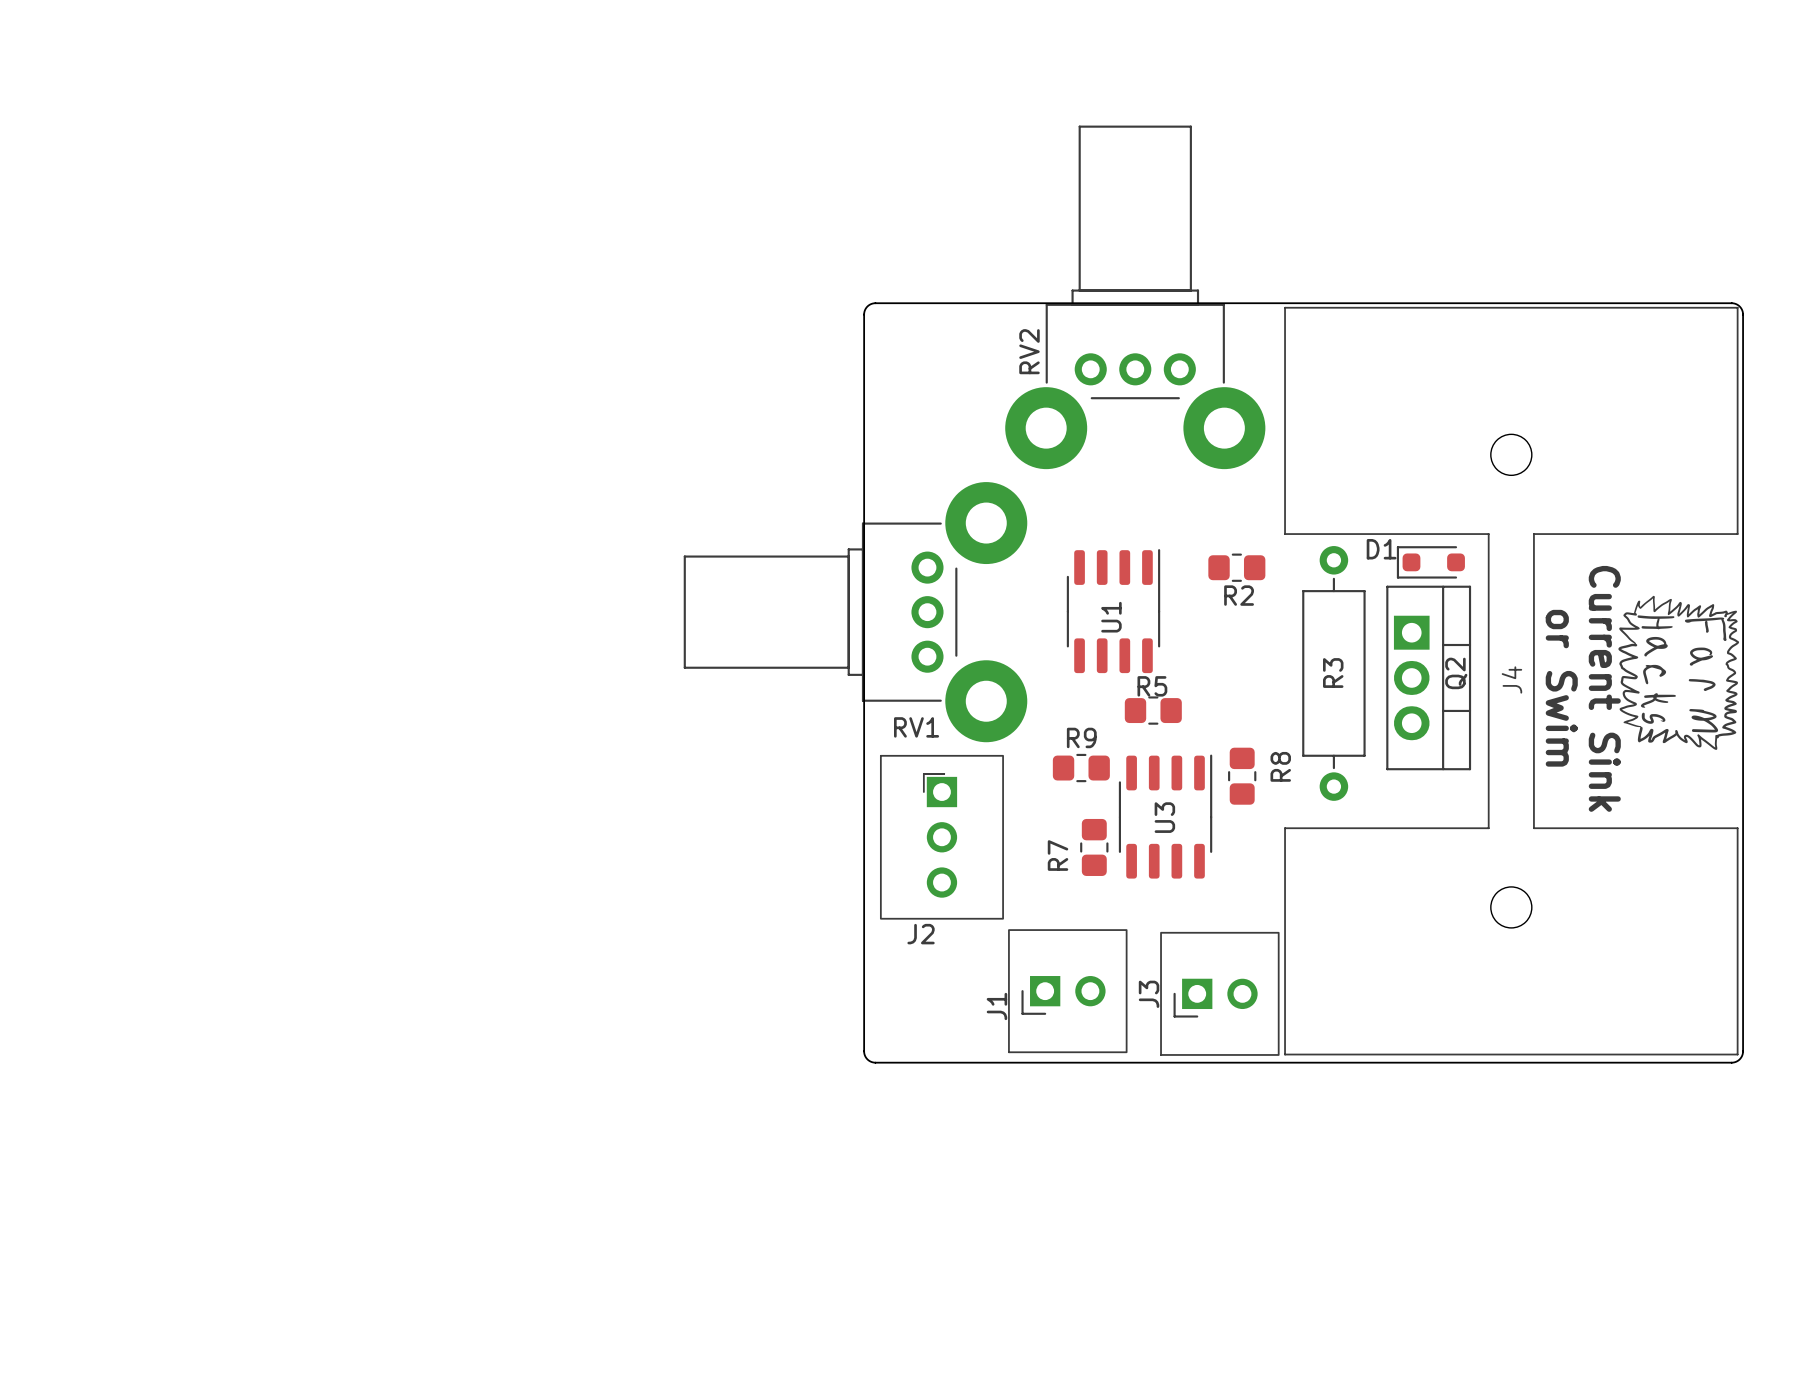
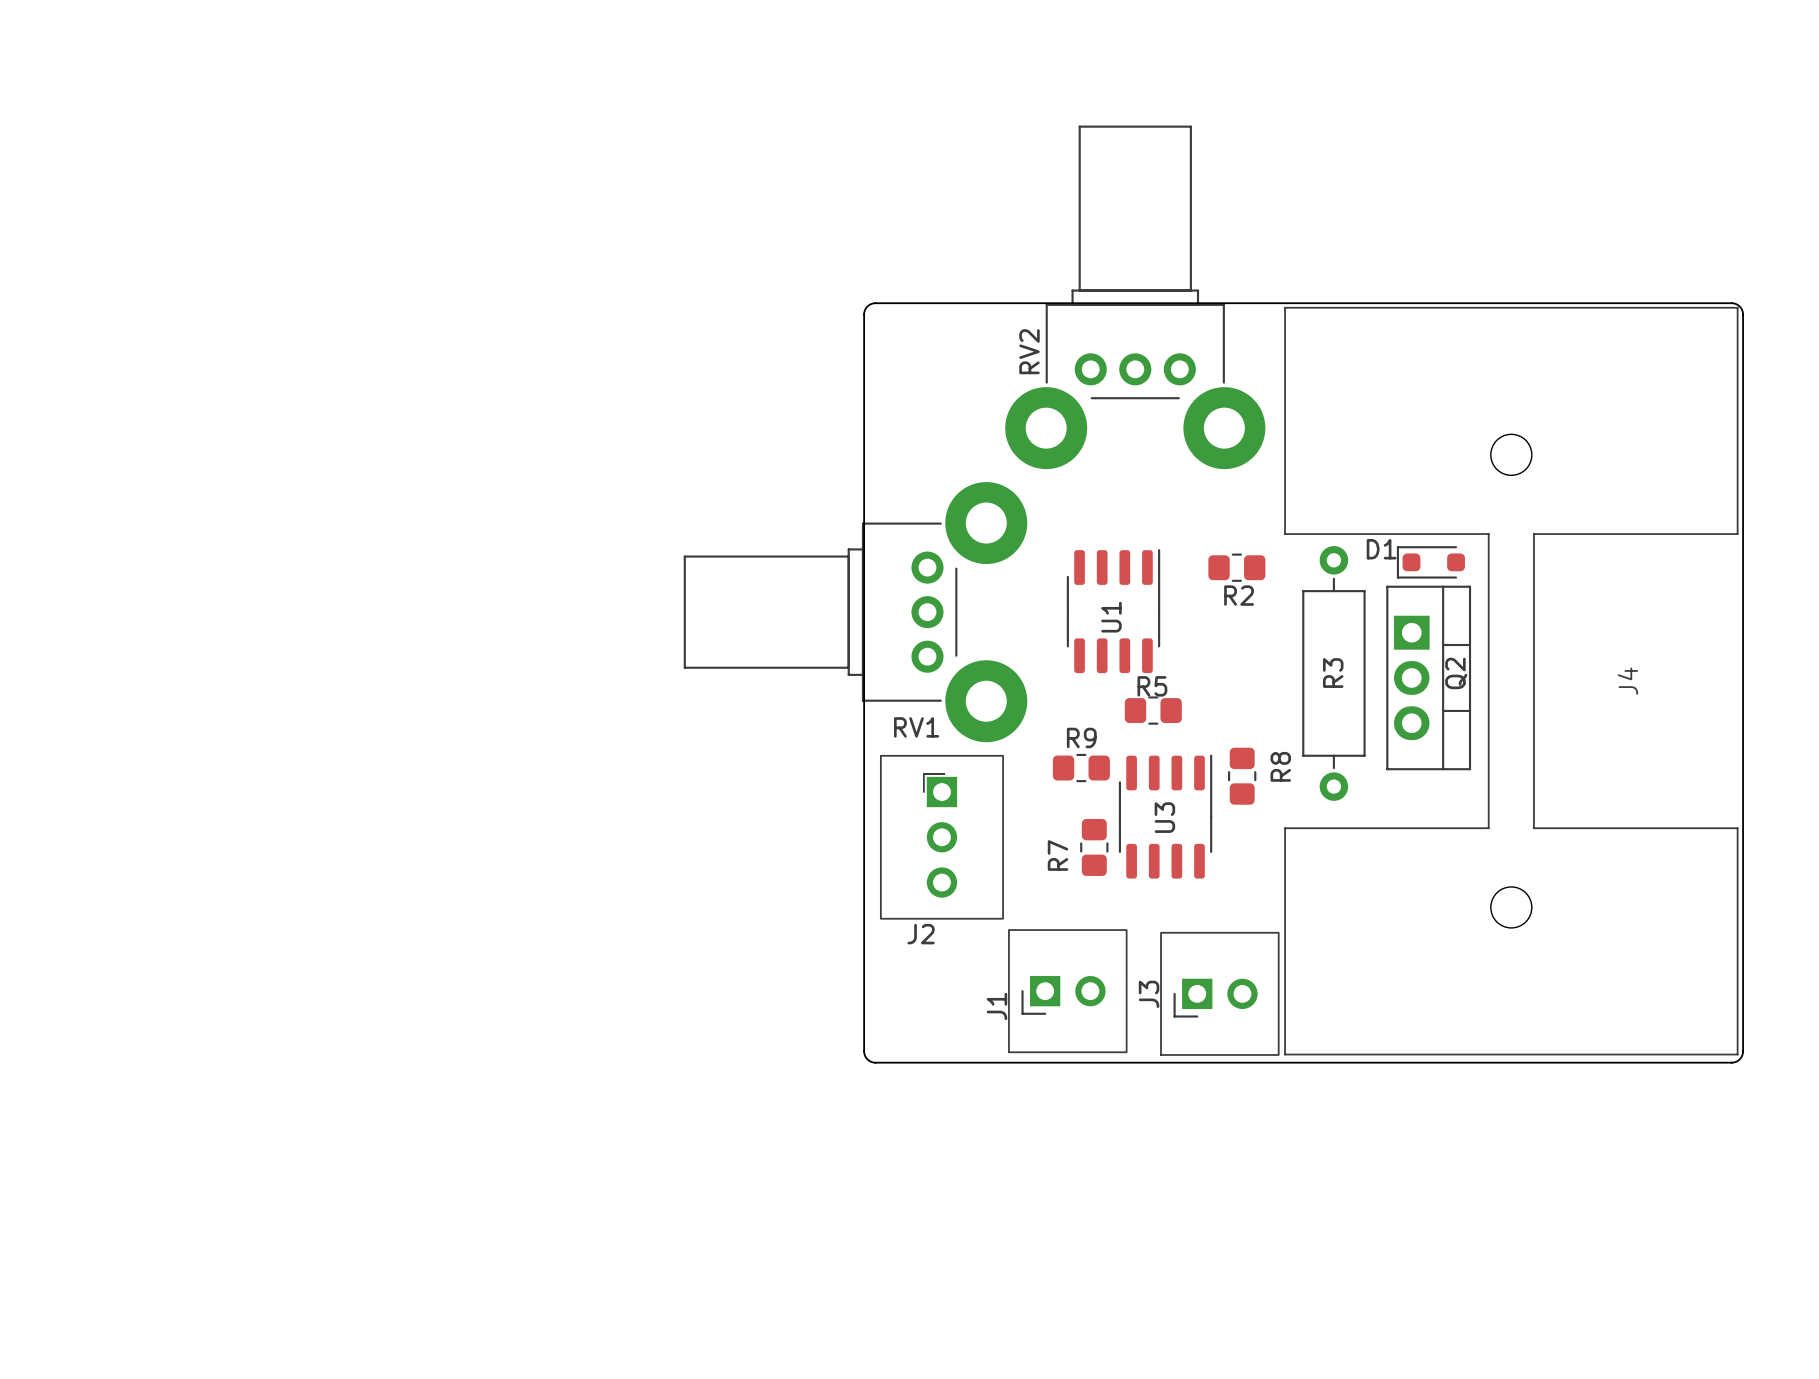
drawing: [1618, 595, 1740, 750] -> none
J4 name position: J4 (1511, 679) -> J4 (1627, 681)
text: or Swim (1561, 688) -> none
text: Current Sink (1604, 688) -> none

